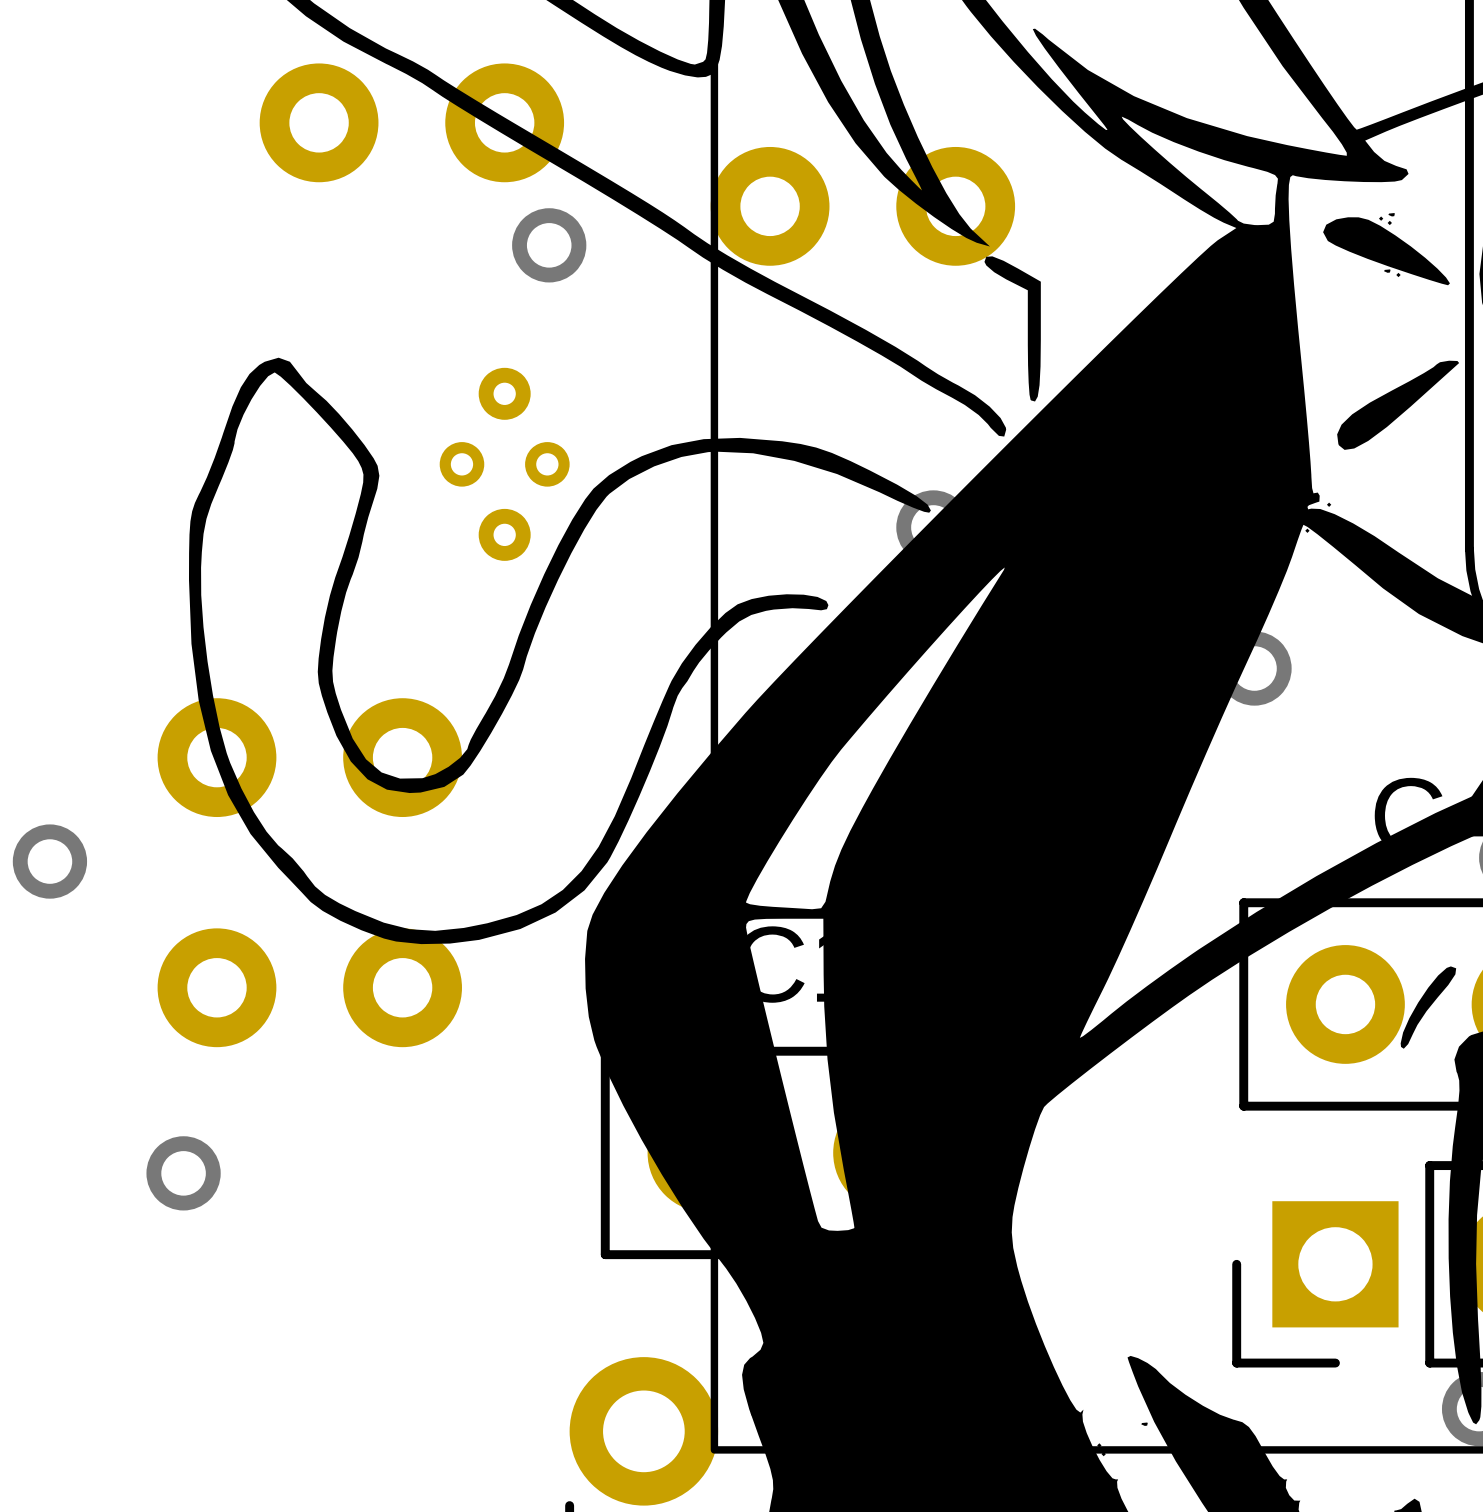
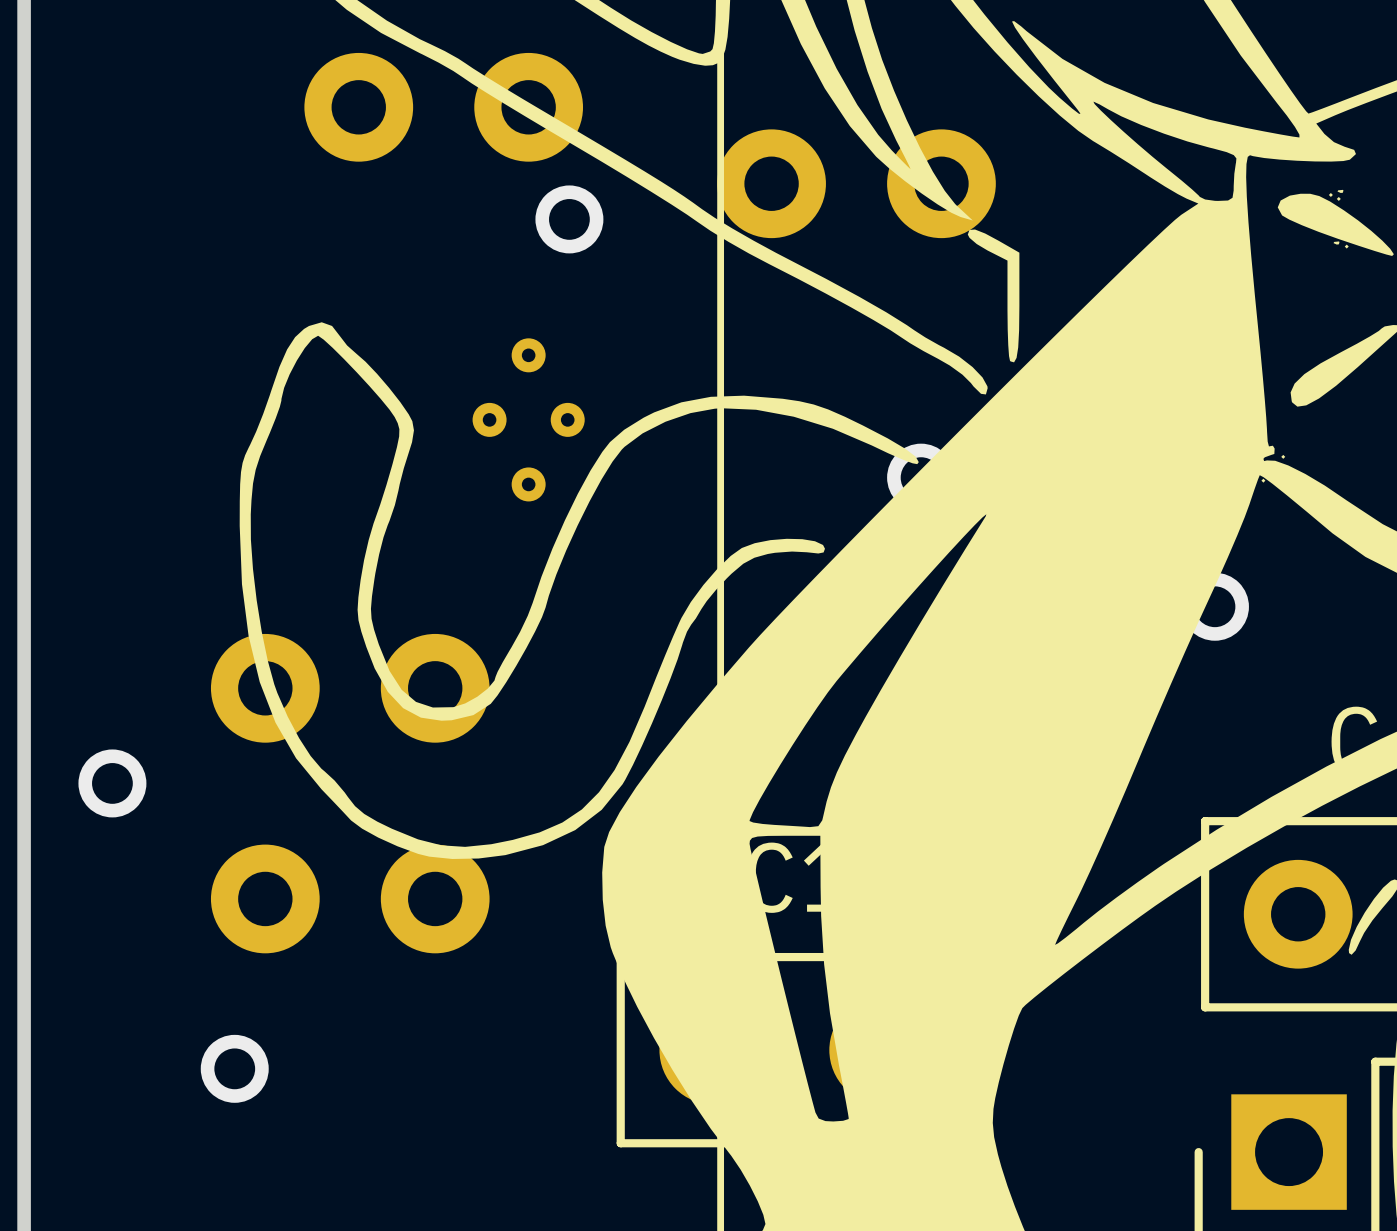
part footprint: [439, 367, 570, 561] -> [472, 338, 585, 502]

